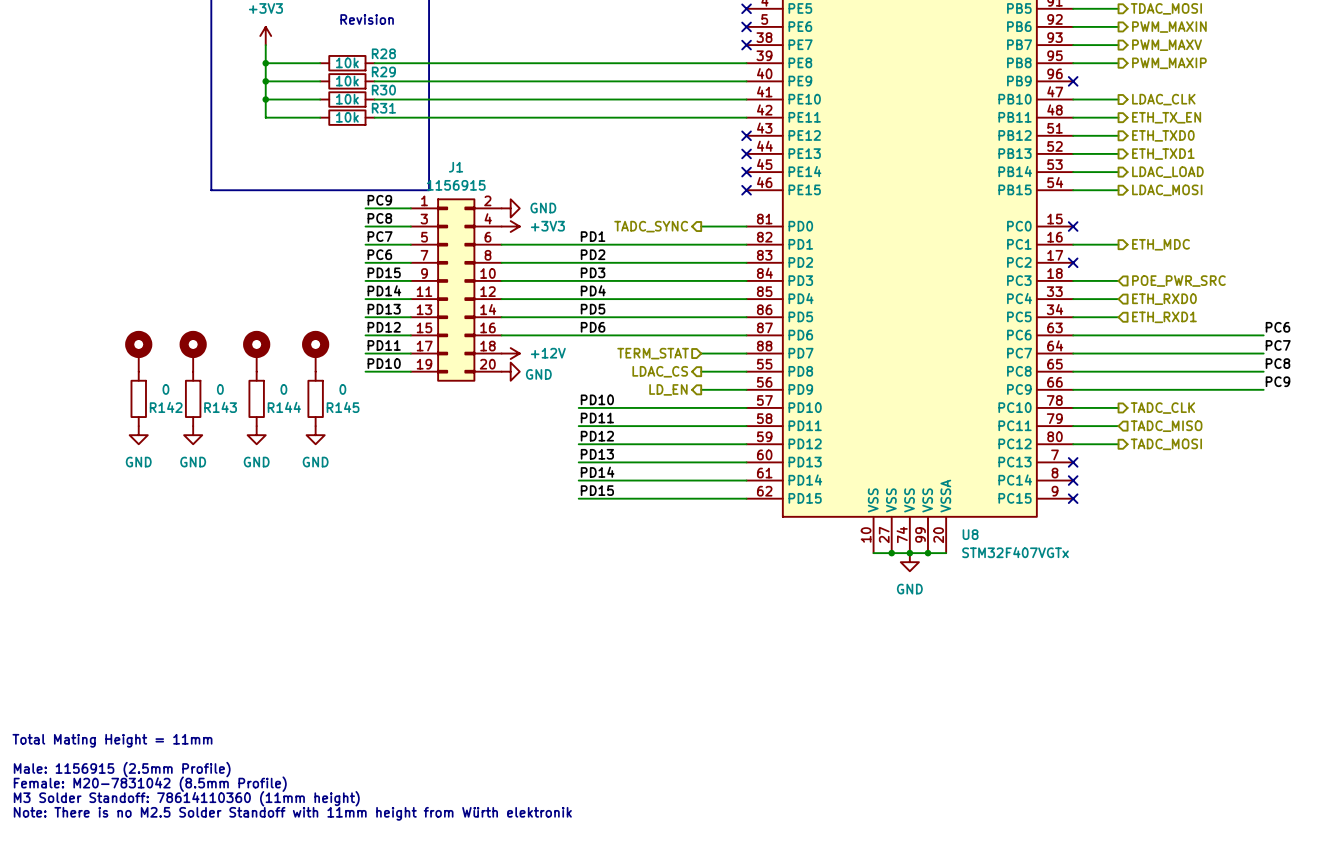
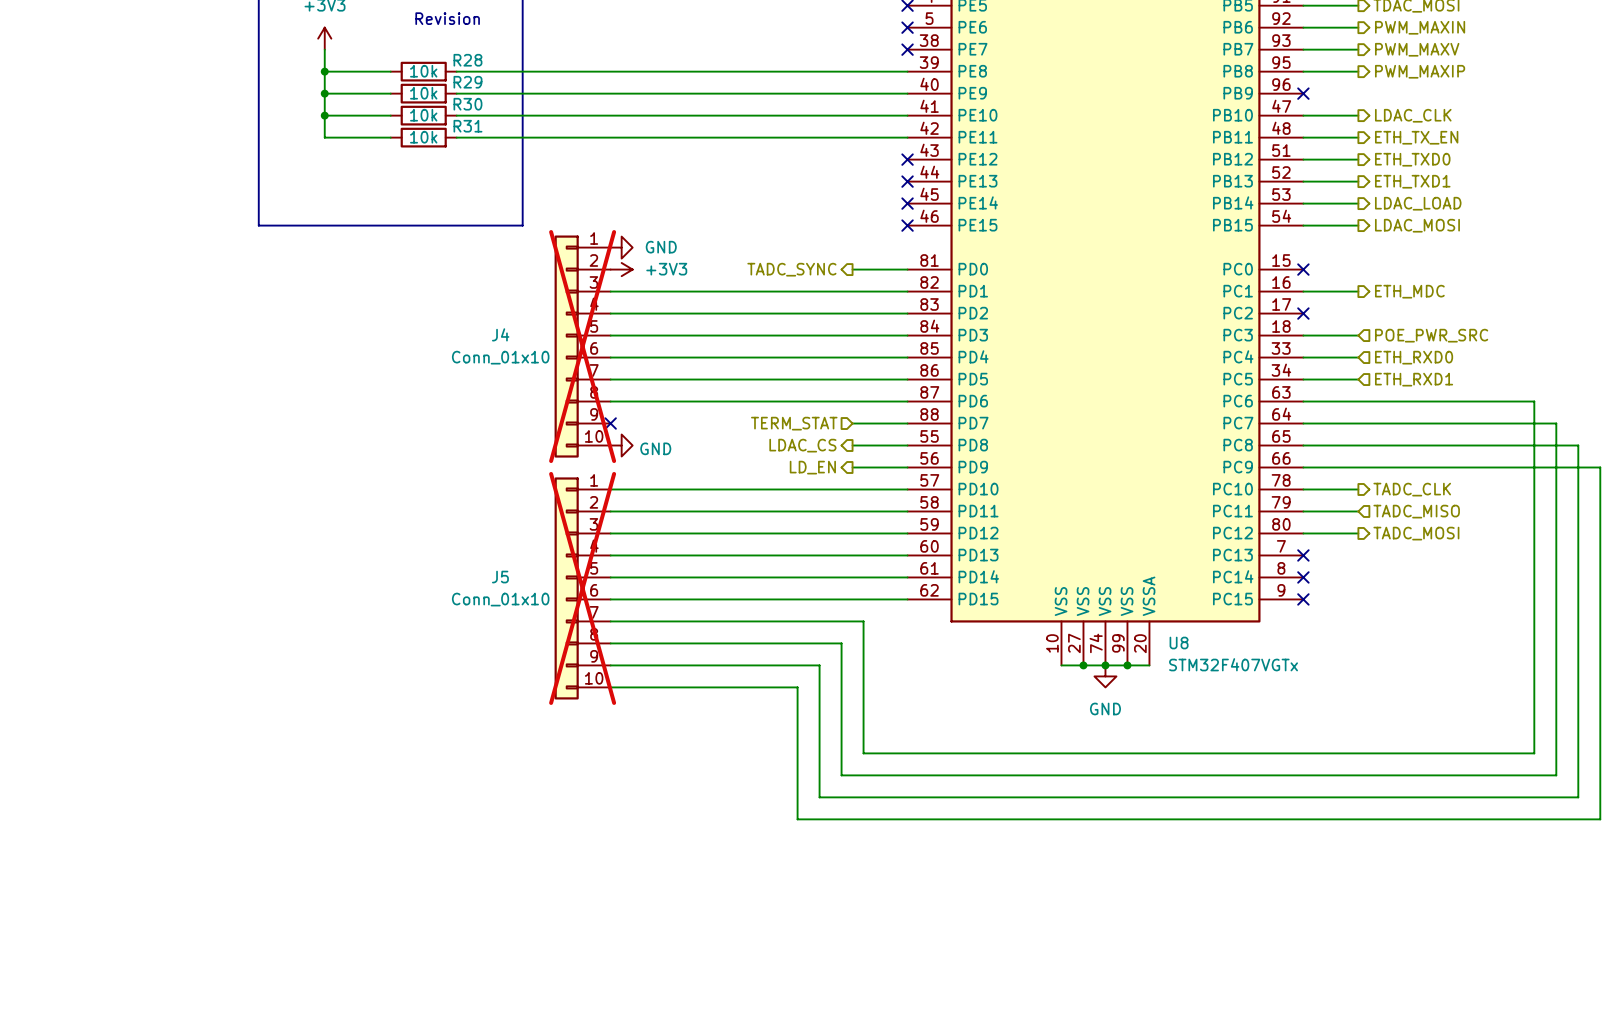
label: PC9 (379, 200) -> none
wire: (365, 208) (410, 208) -> none
label: PC8 (379, 218) -> none
wire: (365, 226) (410, 226) -> none
label: PC7 (380, 236) -> none
label: PD1 (593, 236) -> none
wire: (365, 244) (410, 244) -> none
label: PC6 (379, 254) -> none
label: PD2 (593, 254) -> none
wire: (365, 262) (410, 262) -> none
label: PD15 (384, 272) -> none
label: PD3 (593, 272) -> none
wire: (365, 280) (410, 280) -> none
label: PD14 (384, 290) -> none
J1: 1156915 (456, 290) -> none
J4: none -> Conn_01x10 (582, 346)
label: PD4 (593, 290) -> none
wire: (365, 299) (410, 299) -> none
label: PD13 (384, 309) -> none
label: PD5 (593, 309) -> none
wire: (365, 317) (410, 317) -> none
label: PD12 (384, 327) -> none
label: PD6 (593, 327) -> none
label: PC6 (1277, 327) -> none
wire: (365, 335) (410, 335) -> none
wire: none -> (1534, 401) (1534, 753) (863, 753) (863, 621) (610, 621)
label: PD11 (384, 345) -> none
label: PC7 (1278, 345) -> none
part: (138, 351) -> none
part: (193, 351) -> none
part: (256, 351) -> none
part: (315, 351) -> none
wire: (365, 353) (410, 353) -> none
no-connect mark: none -> (610, 423)
power symbol: +12V (510, 353) -> none
wire: none -> (1534, 423) (1556, 423) (1556, 775) (841, 775) (841, 643) (610, 643)
label: PD10 (384, 363) -> none
label: PC8 (1277, 363) -> none
wire: (365, 371) (410, 371) -> none
wire: none -> (1534, 445) (1578, 445) (1578, 797) (819, 797) (819, 665) (610, 665)
label: PC9 (1277, 381) -> none
wire: none -> (1534, 467) (1600, 467) (1600, 819) (797, 819) (797, 687) (610, 687)
R142: 0 (138, 398) -> none
R143: 0 (193, 398) -> none
R144: 0 (256, 398) -> none
R145: 0 (315, 398) -> none
label: PD10 (597, 399) -> none
wire: none -> (610, 489) (704, 489)
label: PD11 (597, 418) -> none
wire: none -> (610, 511) (704, 511)
power symbol: GND (138, 435) -> none
power symbol: GND (193, 435) -> none
power symbol: GND (256, 435) -> none
power symbol: GND (315, 435) -> none
label: PD12 (597, 436) -> none
wire: none -> (610, 533) (704, 533)
label: PD13 (597, 454) -> none
wire: none -> (610, 555) (704, 555)
label: PD14 (597, 472) -> none
wire: none -> (610, 577) (704, 577)
J5: none -> Conn_01x10 (582, 588)
label: PD15 (597, 490) -> none
wire: none -> (610, 599) (704, 599)
text: Total Mating Height = 11mm (112, 740) -> none
text: Male: 1156915 (2.5mm Profile) (122, 769) -> none
text: Female: M20-7831042 (8.5mm Profile) (150, 784) -> none
text: M3 Solder Standoff: 78614110360 (11mm height) (186, 798) -> none
text: Note: There is no M2.5 Solder Standoff with 11mm height from Würth elektronik (292, 813) -> none

